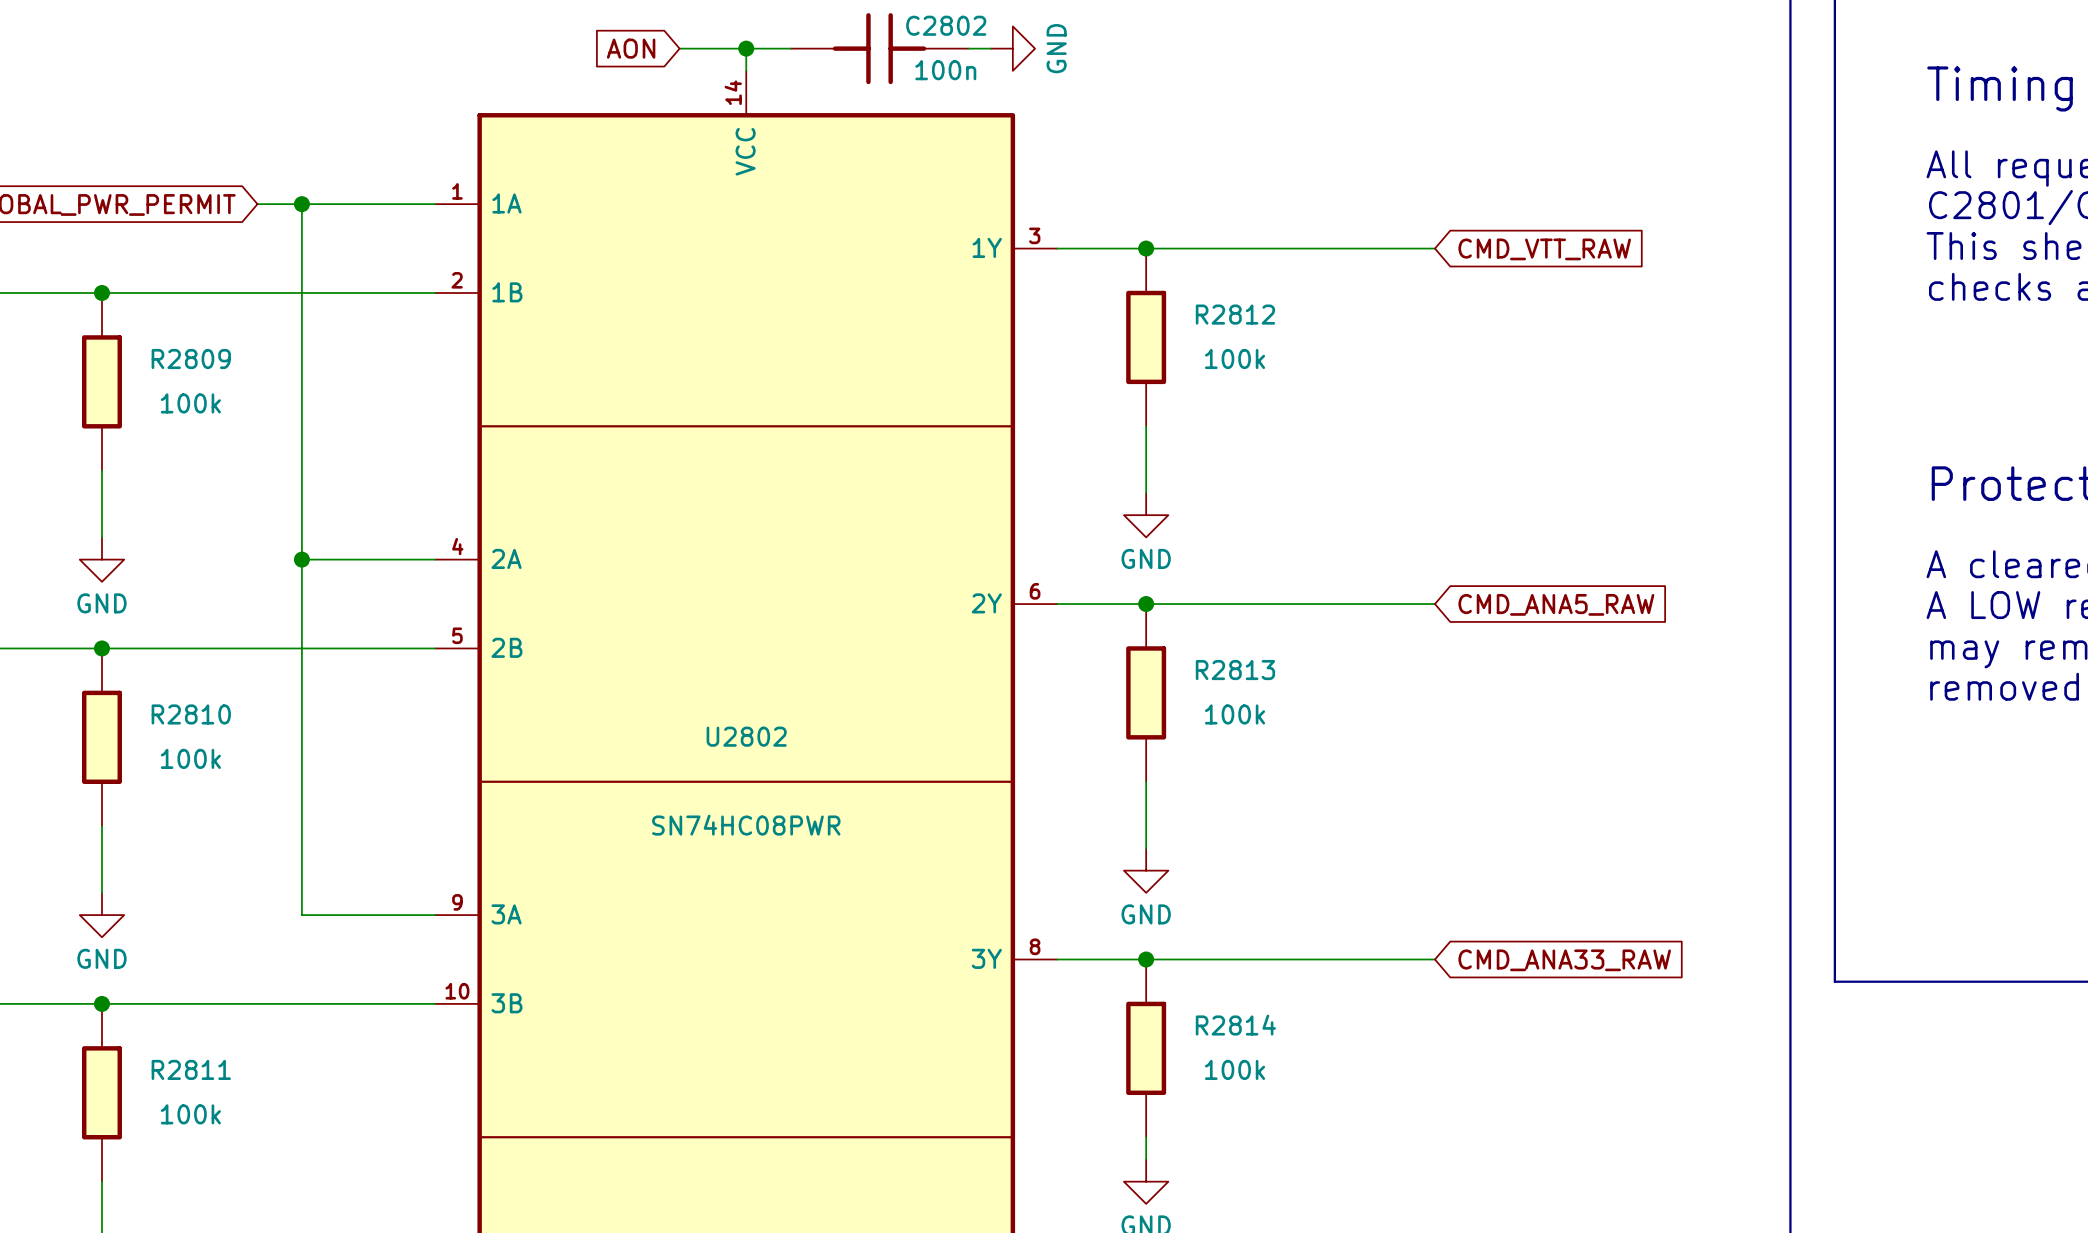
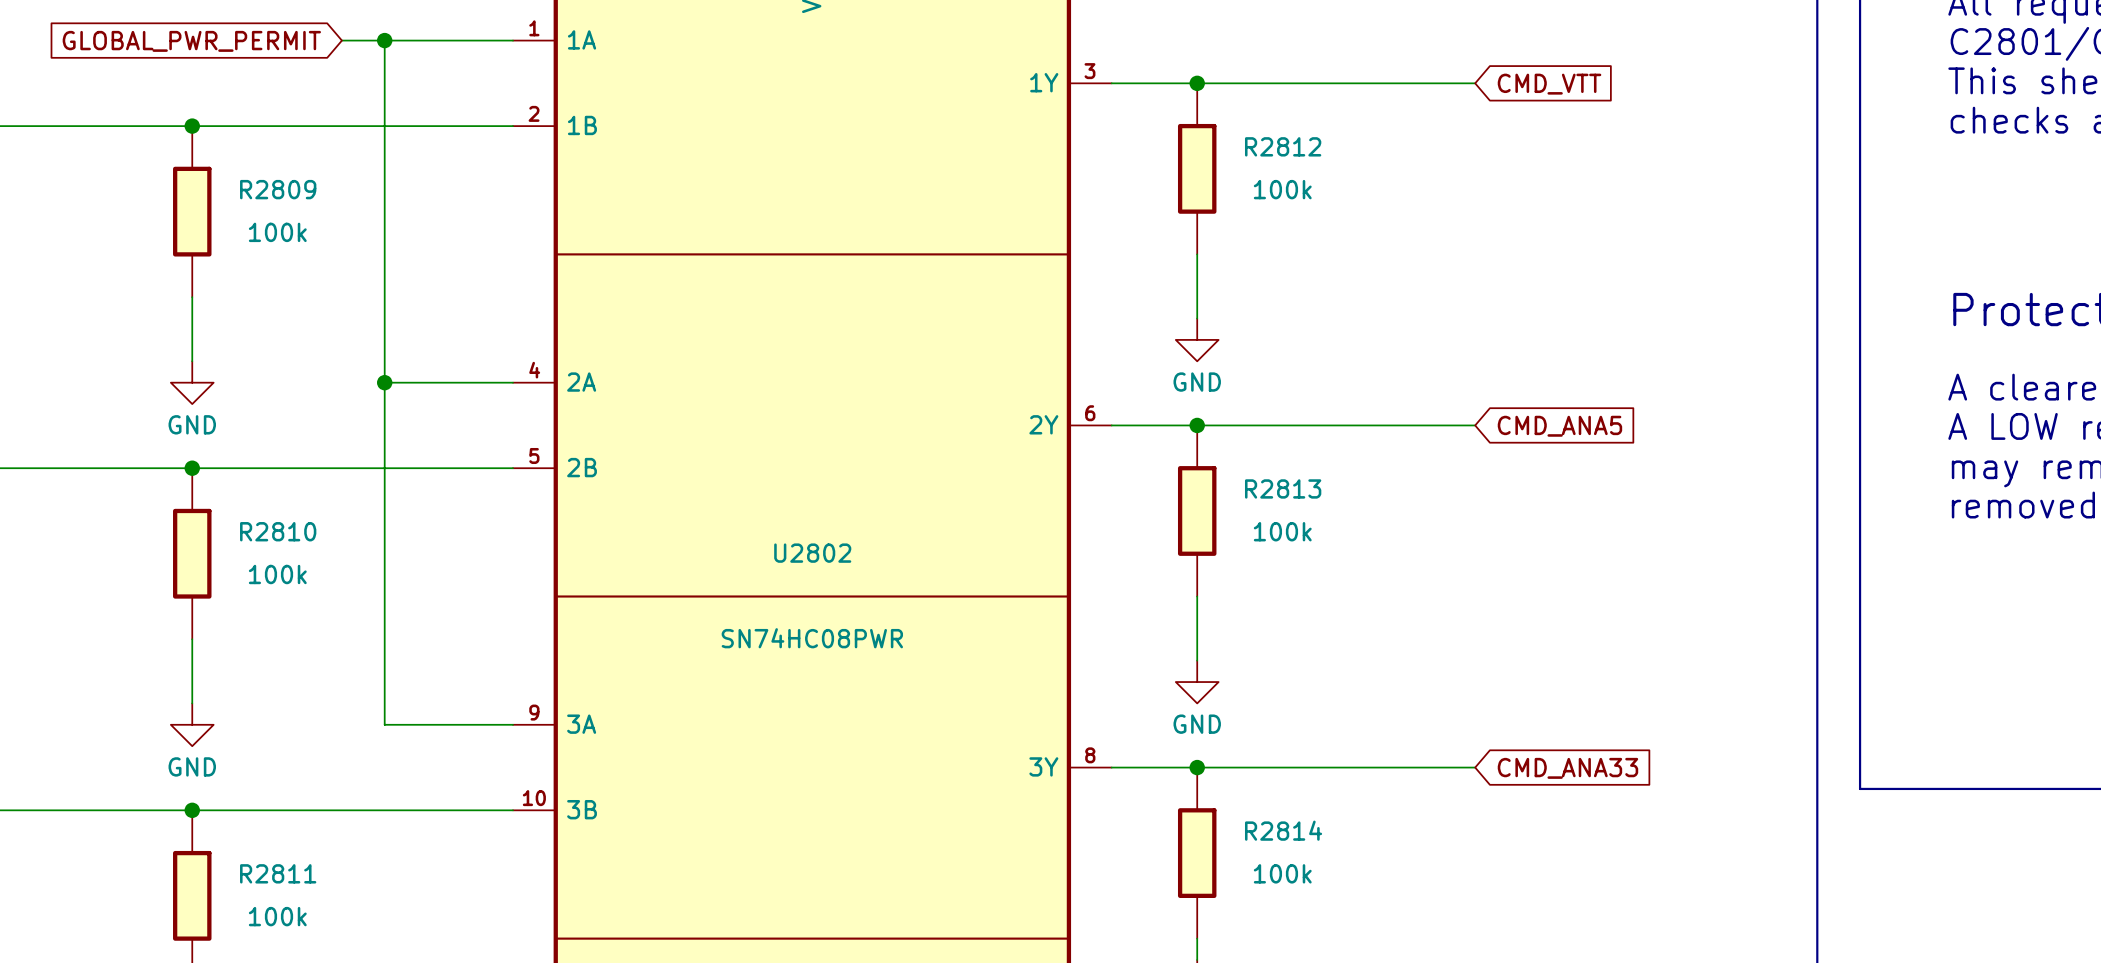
global label: CMD_VTT_RAW (1544, 249) -> CMD_VTT (1549, 84)
global label: CMD_ANA5_RAW (1556, 604) -> CMD_ANA5 (1559, 426)
global label: CMD_ANA33_RAW (1564, 960) -> CMD_ANA33 (1567, 768)

